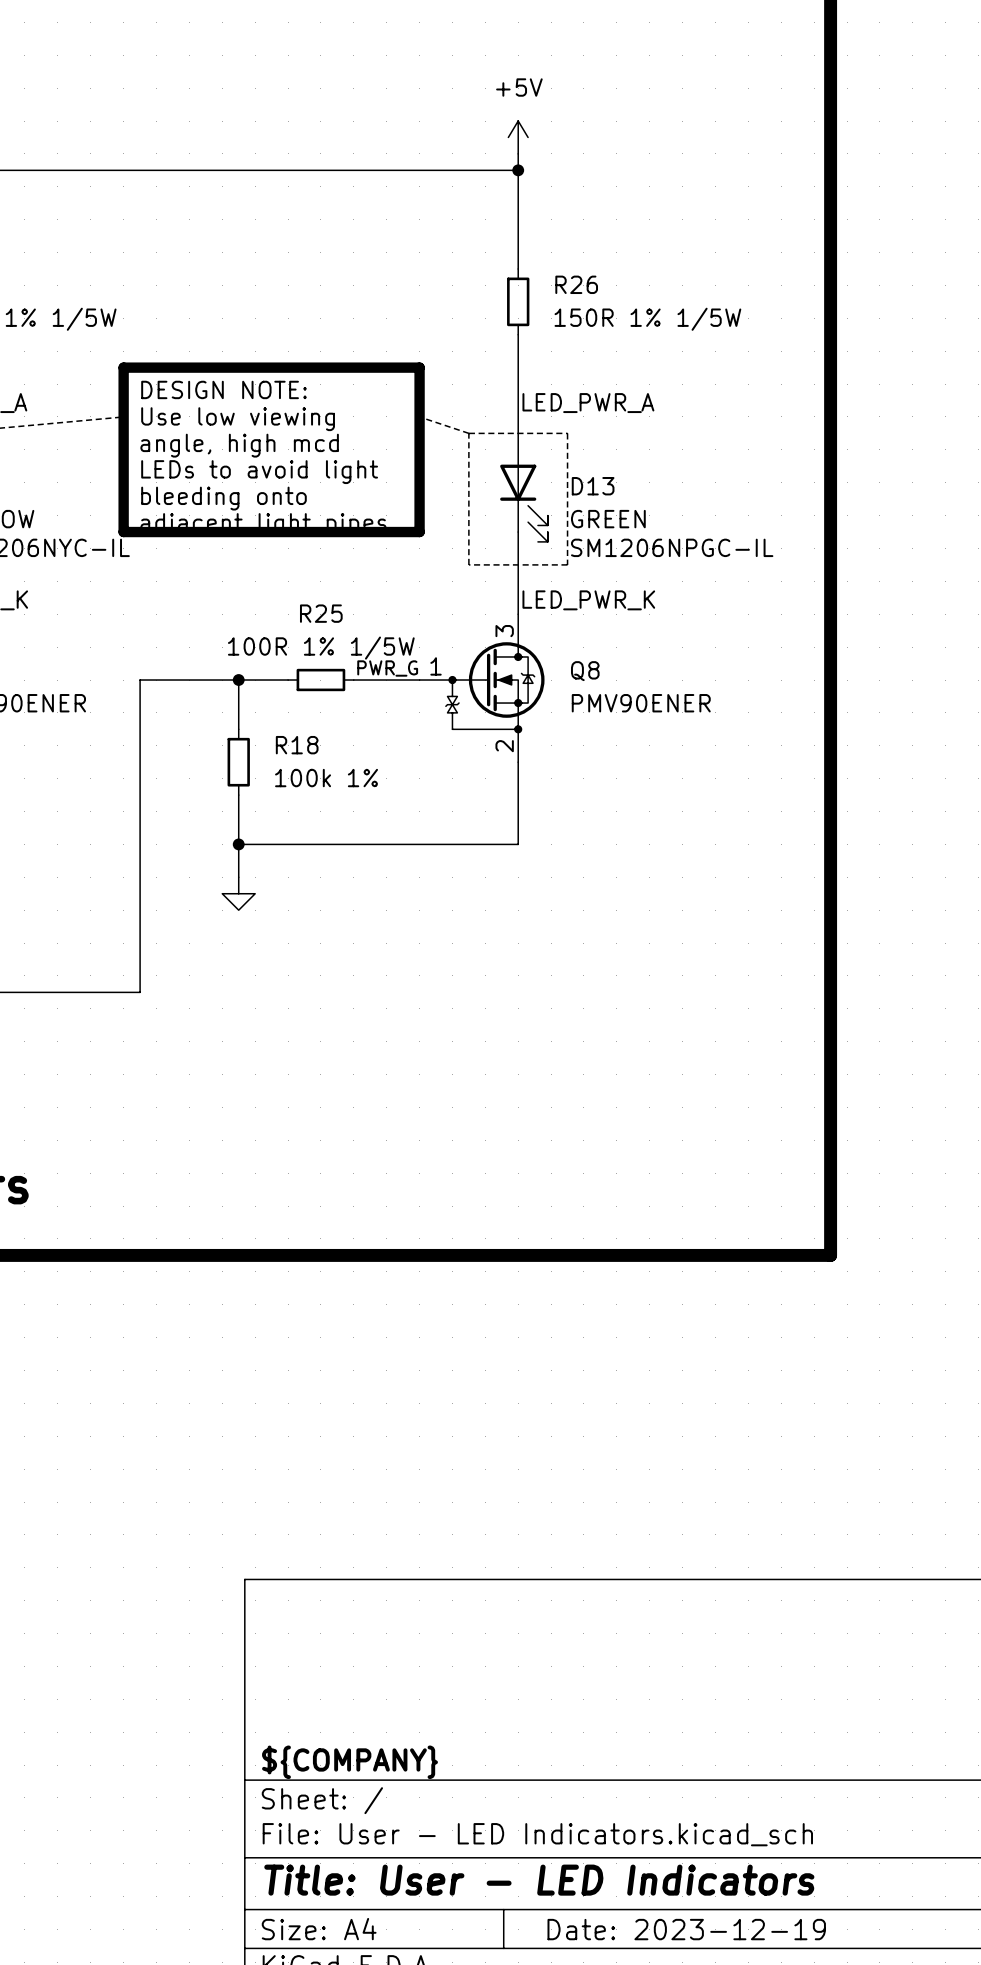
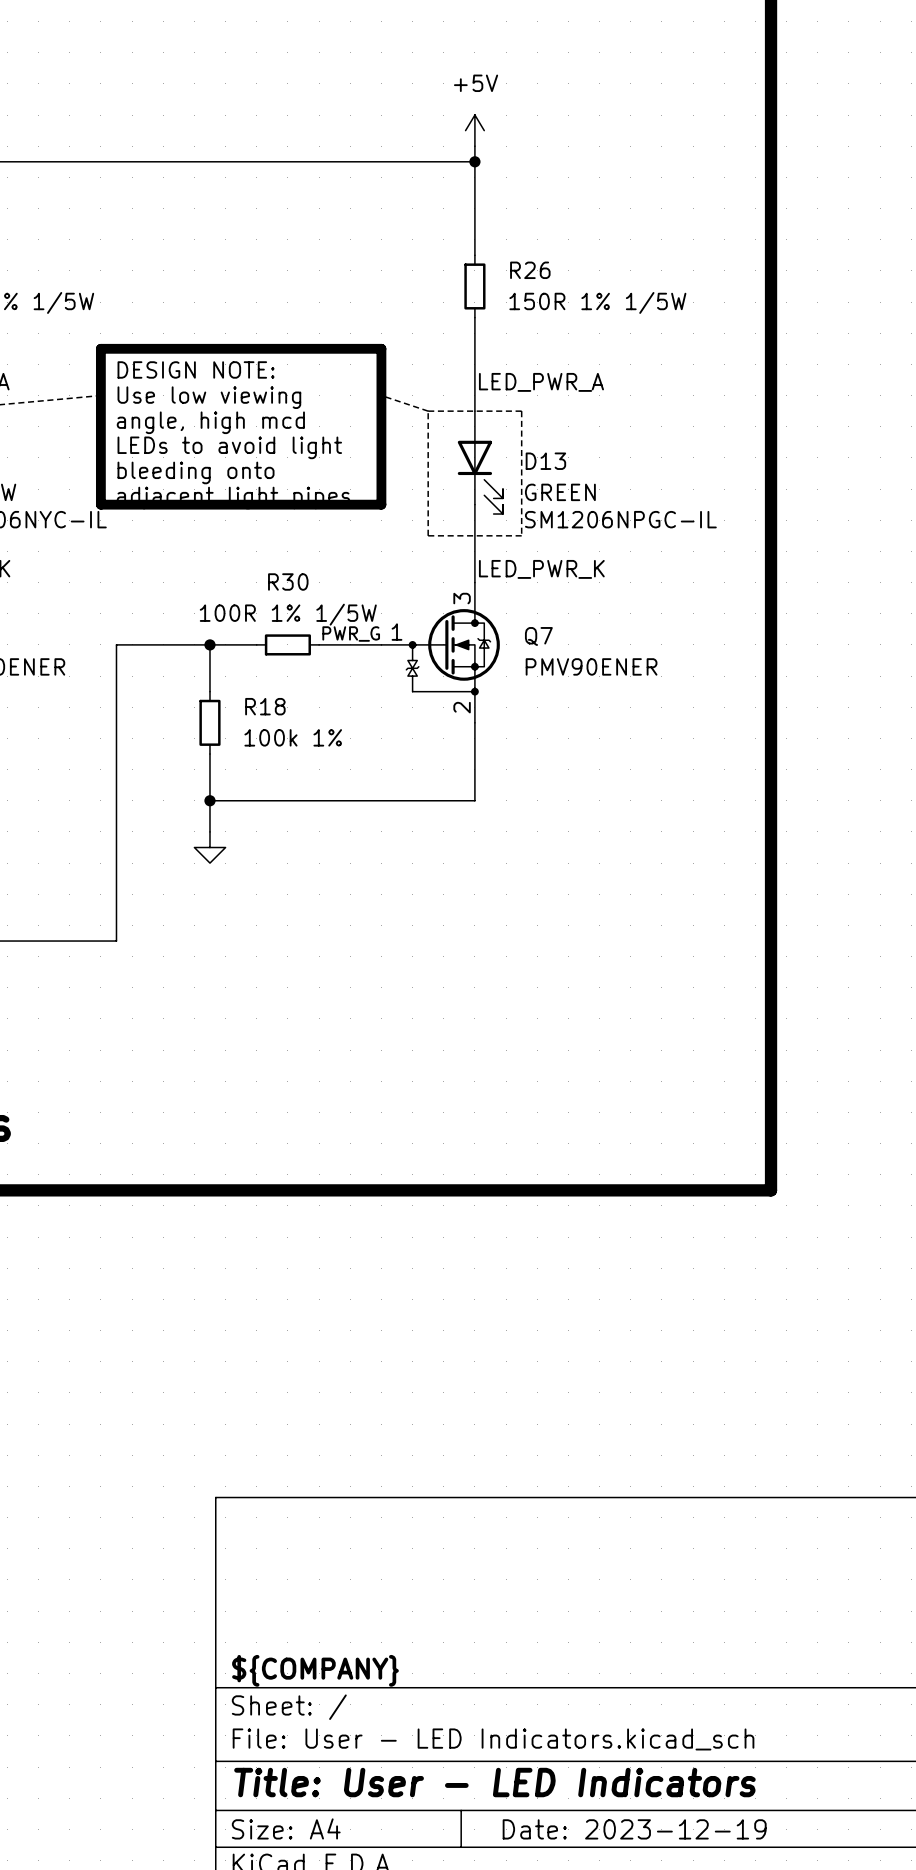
R25 name: R25 (321, 613) -> R30 (288, 582)
Q8 name: Q8 (585, 671) -> Q7 (538, 636)

